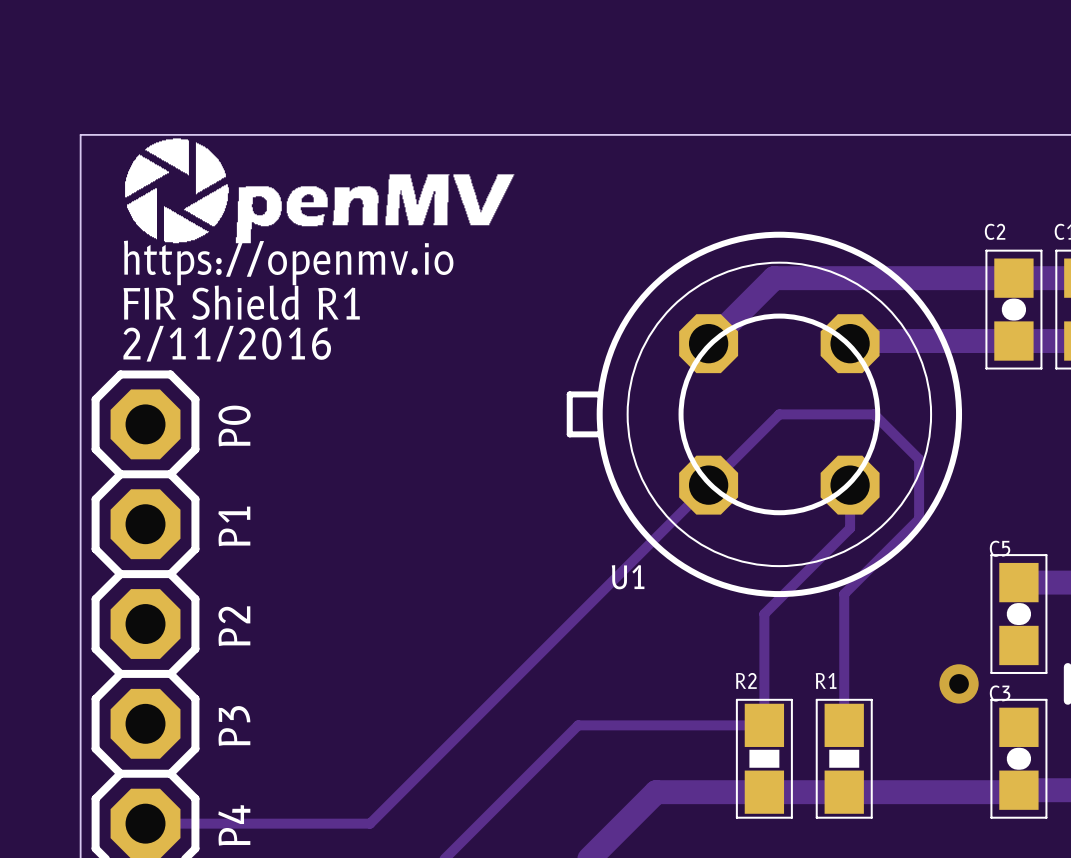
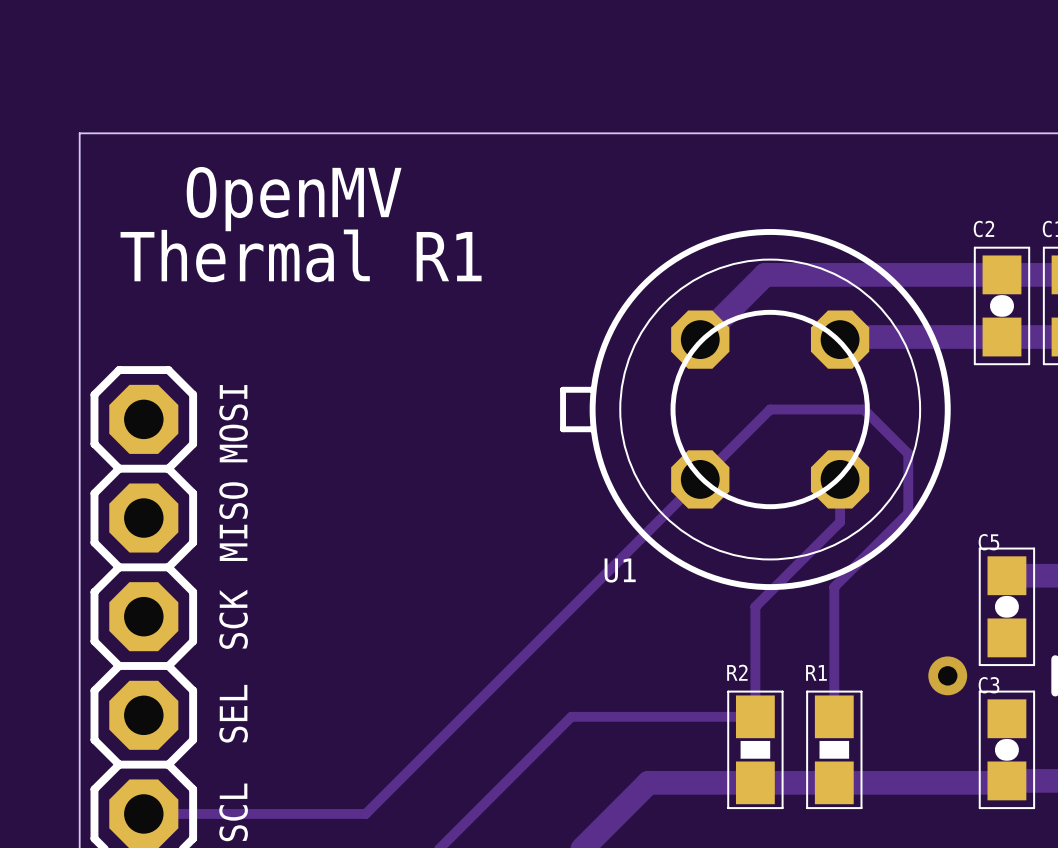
drawing: [125, 138, 515, 244] -> none
text: none -> OpenMV (294, 199)
text: https://openmv.io (288, 262) -> Thermal R1 (301, 255)
text: FIR Shield R1 (241, 302) -> none
text: 2/11/2016 (227, 343) -> none
text: P0 (234, 426) -> MOSI (233, 423)
text: P1 (234, 526) -> MISO (233, 521)
text: P2 (234, 626) -> SCK (233, 619)
text: P3 (234, 725) -> SEL (233, 713)
text: P4 (234, 825) -> SCL (233, 812)

